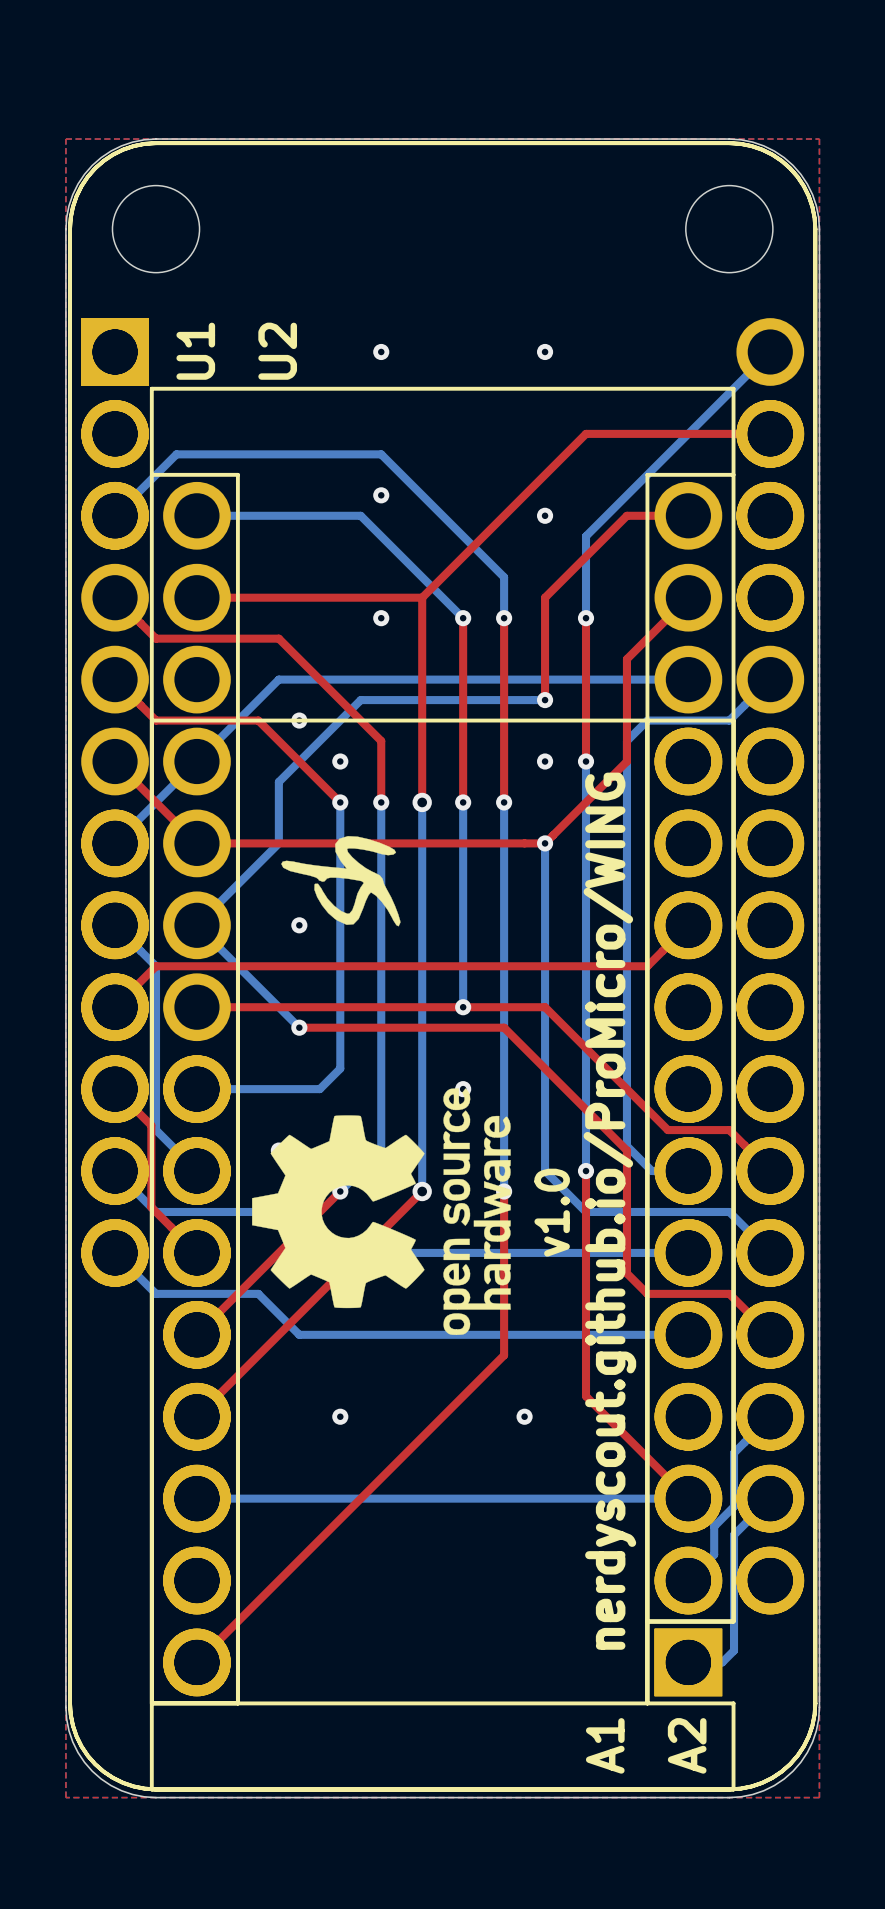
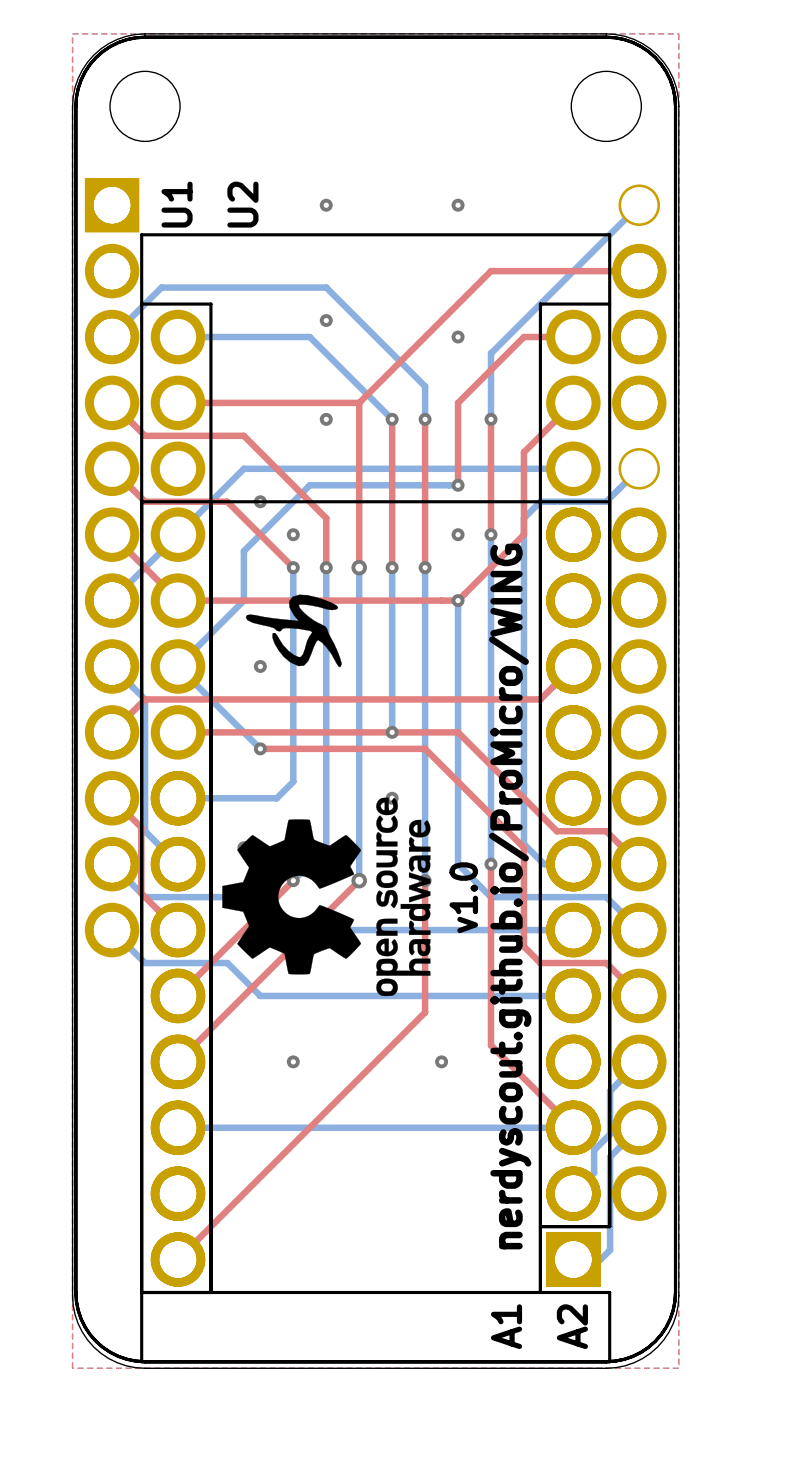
U2 footprint: [68, 141, 818, 1792] -> [74, 35, 678, 1364]

